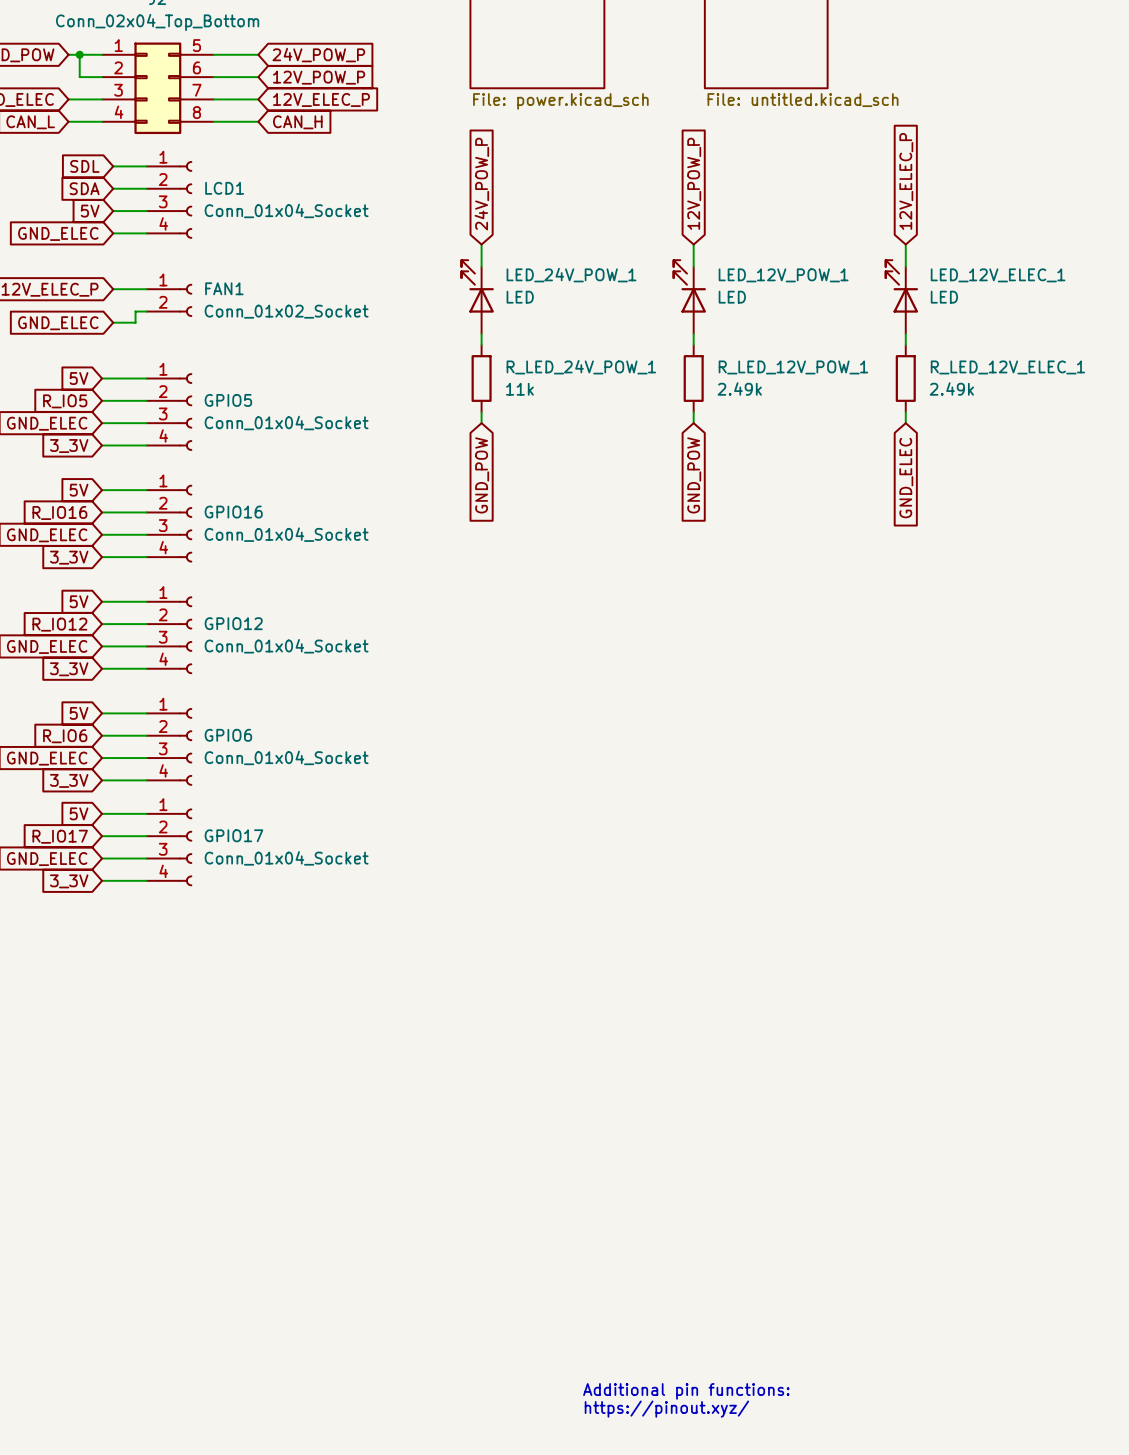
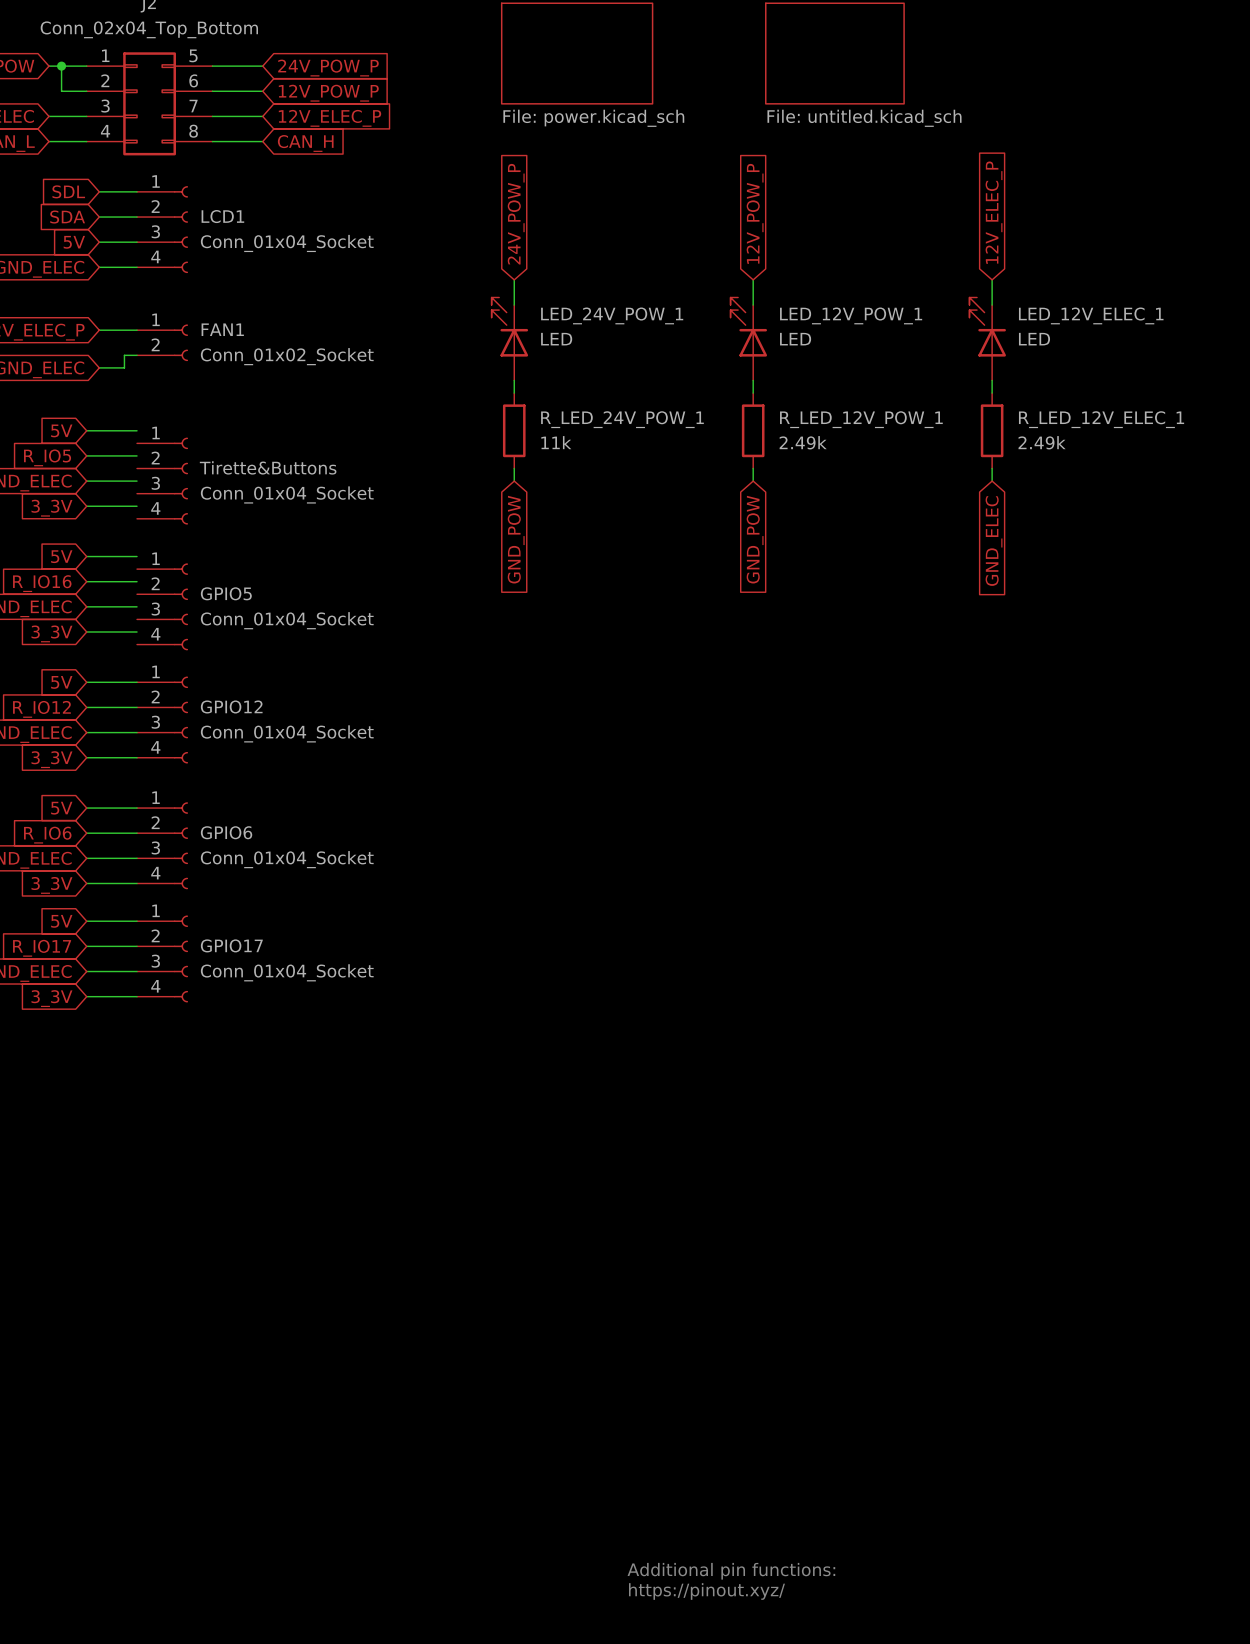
GPIO5 position: (169, 412) -> (162, 606)
Tirette&Buttons: none -> Conn_01x04_Socket (162, 481)
GPIO16: Conn_01x04_Socket (169, 523) -> none

